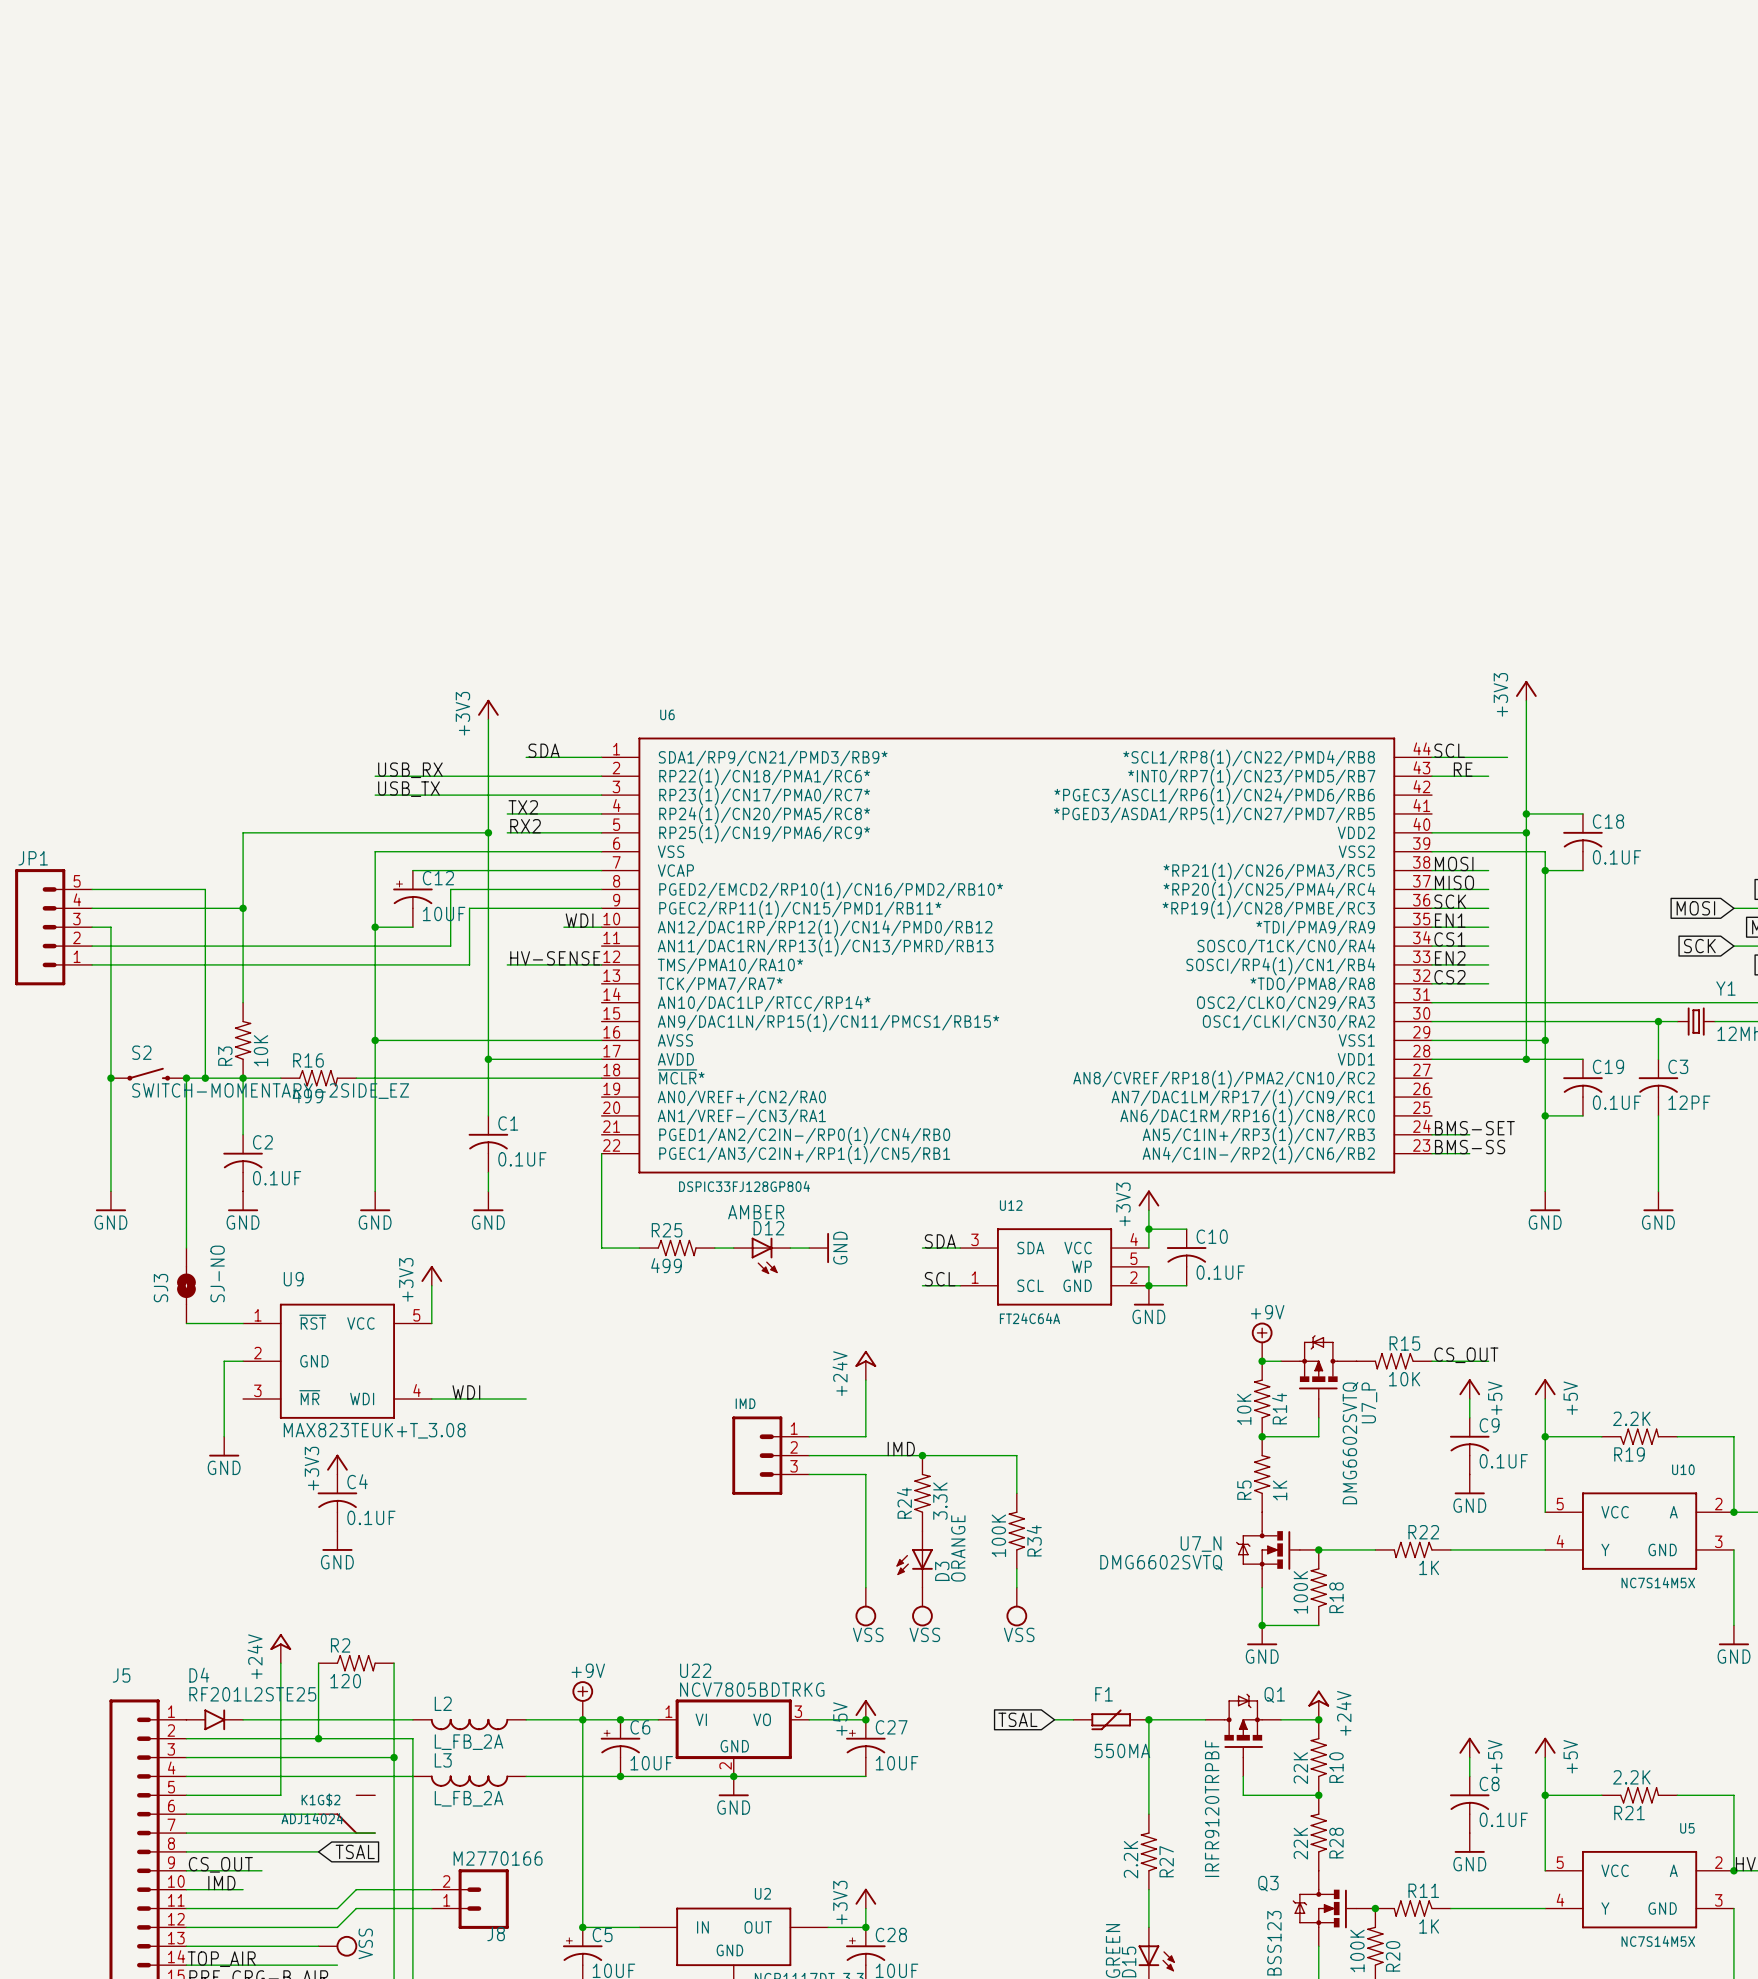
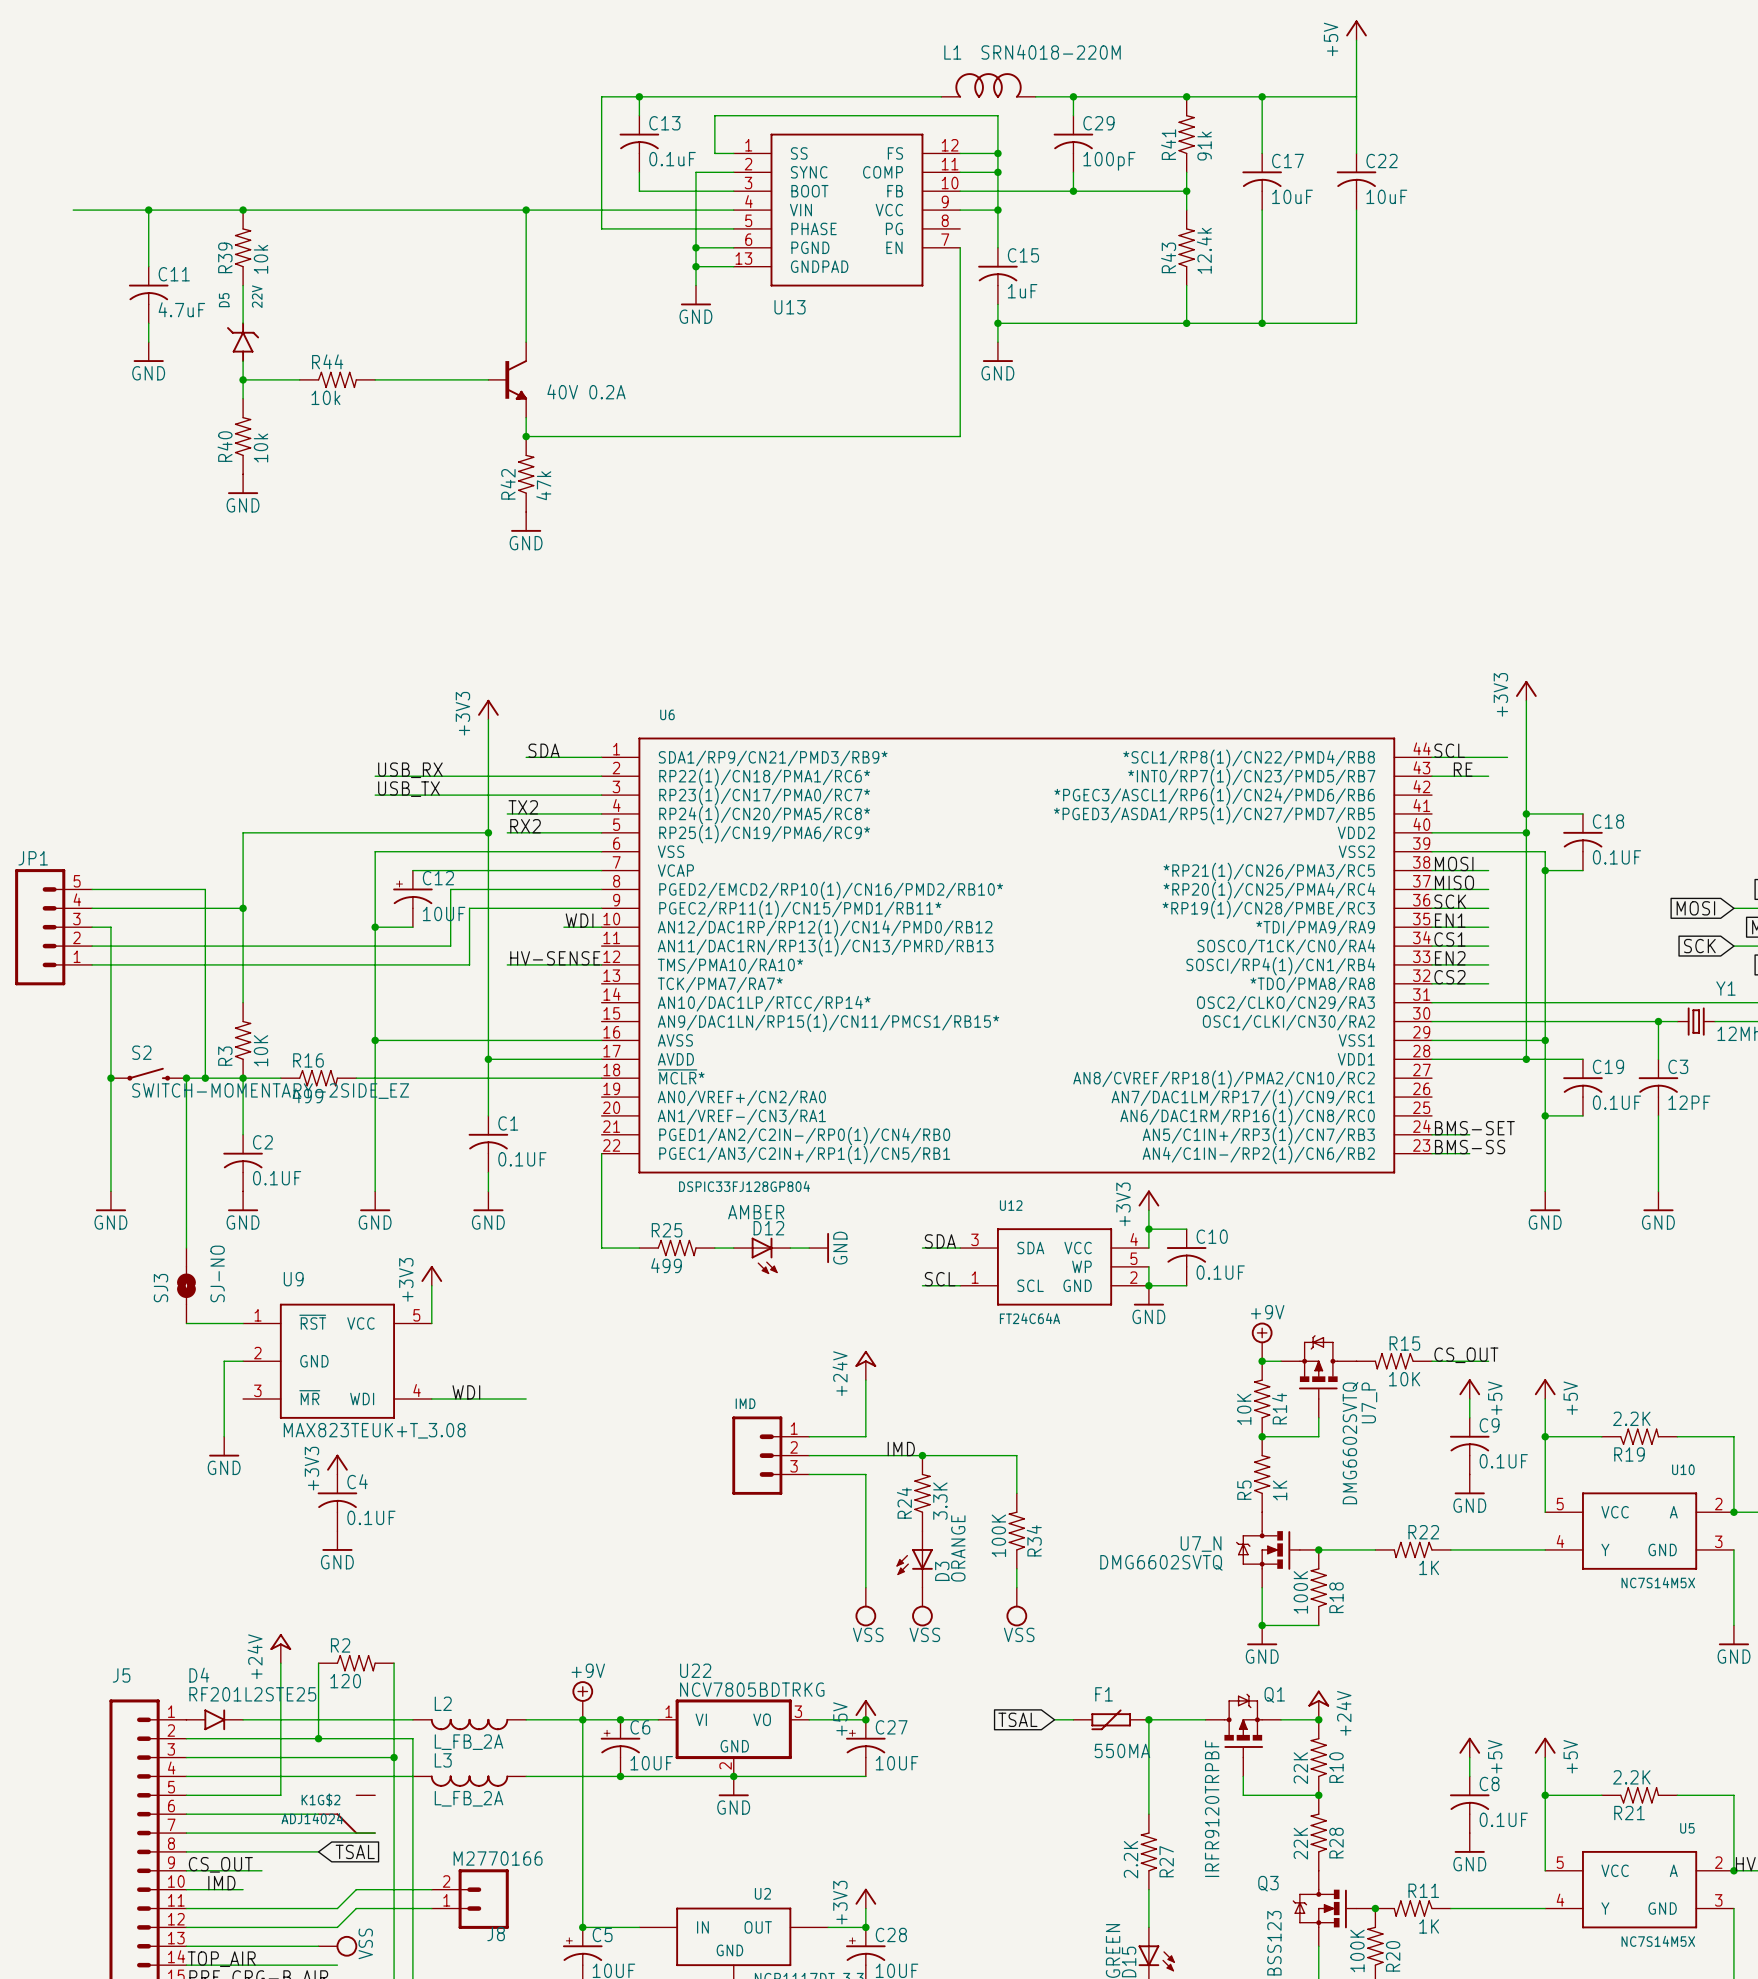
power symbol: none -> +5V (1356, 30)
wire: none -> (1356, 40) (1356, 153)
L1: none -> SRN4018-220M (988, 85)
wire: none -> (639, 96) (639, 115)
junction: none -> (639, 96)
wire: none -> (941, 96) (601, 96) (601, 228) (733, 228)
wire: none -> (1035, 96) (1356, 96)
wire: none -> (1073, 96) (1073, 115)
junction: none -> (1073, 96)
junction: none -> (1186, 96)
wire: none -> (1262, 96) (1262, 153)
junction: none -> (1262, 96)
R41: none -> 91k (1186, 134)
C13: none -> 0.1uF (639, 144)
C29: none -> 100pF (1073, 144)
wire: none -> (733, 153) (714, 153) (714, 115) (997, 115) (997, 247)
wire: none -> (960, 153) (997, 153)
junction: none -> (997, 153)
wire: none -> (639, 172) (639, 191) (733, 191)
wire: none -> (733, 172) (696, 172) (696, 285)
wire: none -> (960, 172) (997, 172)
junction: none -> (997, 172)
wire: none -> (1073, 172) (1073, 191)
wire: none -> (1186, 172) (1186, 210)
C17: none -> 10uF (1262, 181)
C22: none -> 10uF (1356, 181)
wire: none -> (960, 191) (1186, 191)
junction: none -> (1073, 191)
junction: none -> (1186, 191)
wire: none -> (73, 210) (733, 210)
wire: none -> (148, 210) (148, 266)
junction: none -> (148, 210)
junction: none -> (243, 210)
wire: none -> (526, 210) (526, 342)
junction: none -> (526, 210)
U13: none -> (846, 210)
wire: none -> (960, 210) (997, 210)
junction: none -> (997, 210)
wire: none -> (1262, 210) (1262, 323)
wire: none -> (1356, 210) (1356, 323) (997, 323)
R39: none -> 10k (243, 247)
wire: none -> (696, 247) (733, 247)
junction: none -> (696, 247)
wire: none -> (960, 247) (960, 436) (526, 436) (526, 417)
R43: none -> 12.4k (1186, 247)
wire: none -> (696, 266) (733, 266)
junction: none -> (696, 266)
C15: none -> 1uF (997, 276)
wire: none -> (243, 285) (243, 323)
wire: none -> (1186, 285) (1186, 323)
C11: none -> 4.7uF (148, 294)
power symbol: none -> GND (696, 295)
wire: none -> (997, 304) (997, 342)
wire: none -> (148, 323) (148, 342)
junction: none -> (997, 323)
junction: none -> (1186, 323)
junction: none -> (1262, 323)
D5: none -> 22V (243, 342)
power symbol: none -> GND (148, 352)
power symbol: none -> GND (997, 352)
wire: none -> (243, 361) (243, 398)
wire: none -> (243, 379) (299, 379)
junction: none -> (243, 379)
R44: none -> 10k (337, 379)
wire: none -> (375, 379) (488, 379)
part: none -> 40V 0.2A (507, 379)
R40: none -> 10k (243, 436)
junction: none -> (526, 436)
R42: none -> 47k (526, 474)
power symbol: none -> GND (243, 484)
power symbol: none -> GND (526, 521)

